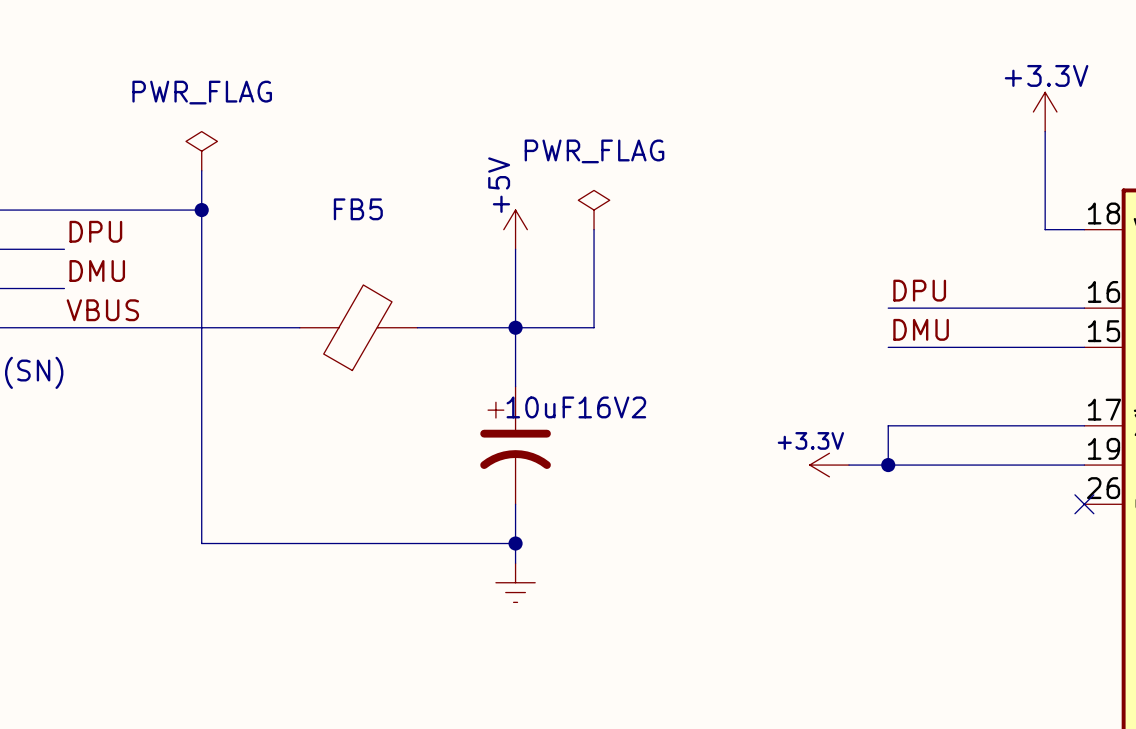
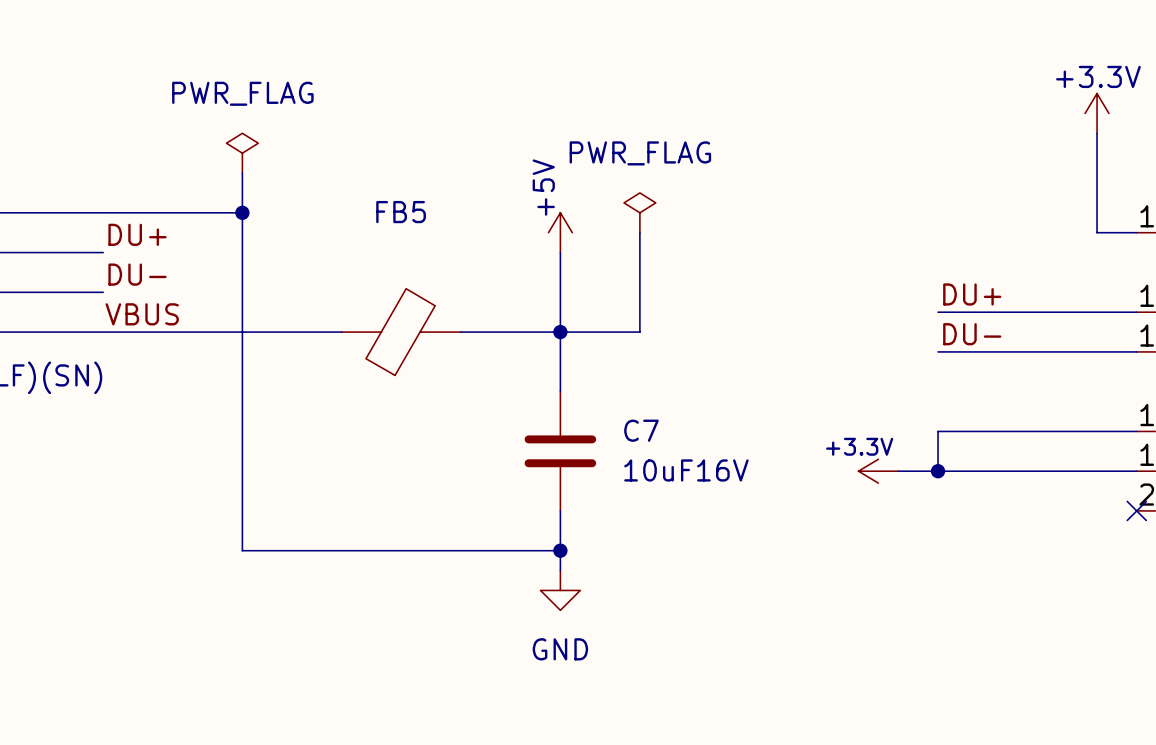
label: DPU (95, 231) -> DU+ (137, 234)
label: DMU (97, 271) -> DU- (137, 274)
label: DPU (919, 290) -> DU+ (972, 294)
label: DMU (921, 329) -> DU- (972, 334)
10uF16V2: (515, 445) -> none
C7: none -> 10uF16V (560, 451)
power symbol shape: [495, 563, 536, 603] -> [540, 570, 581, 611]
power symbol text: none -> GND (560, 649)

